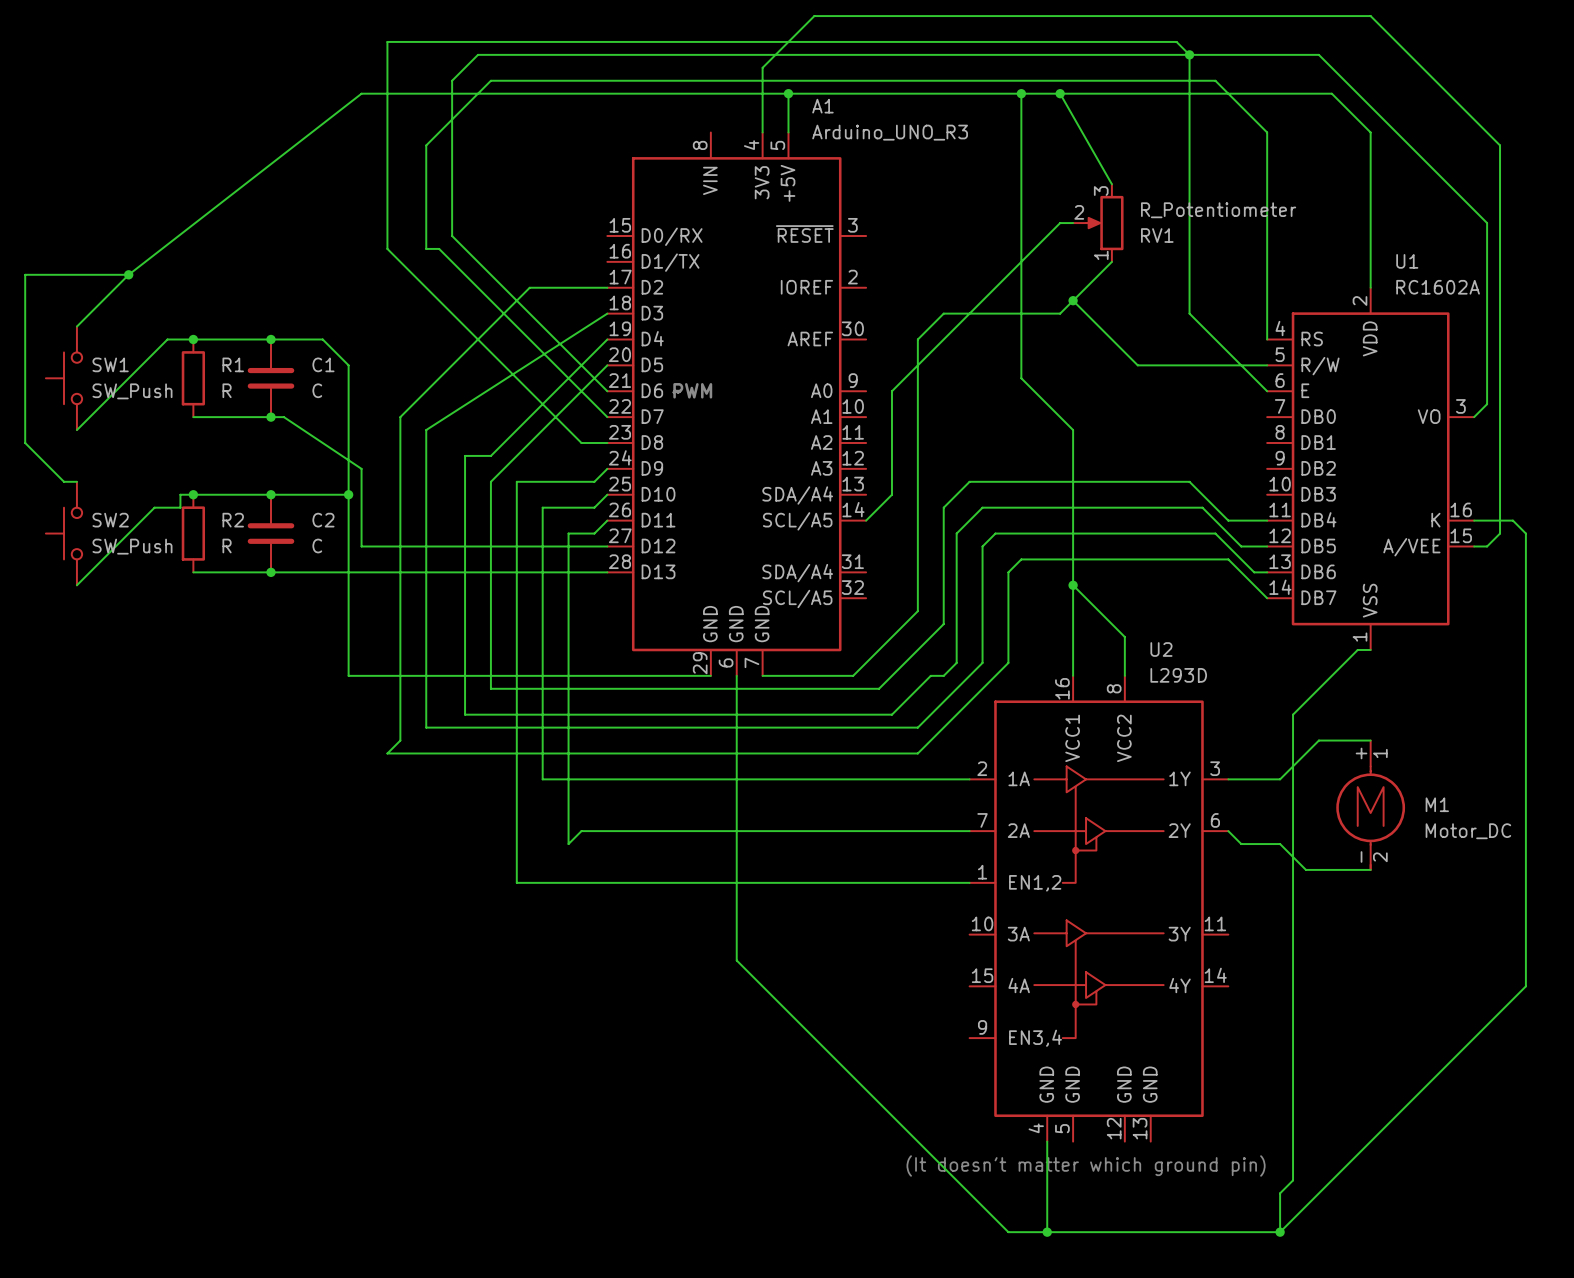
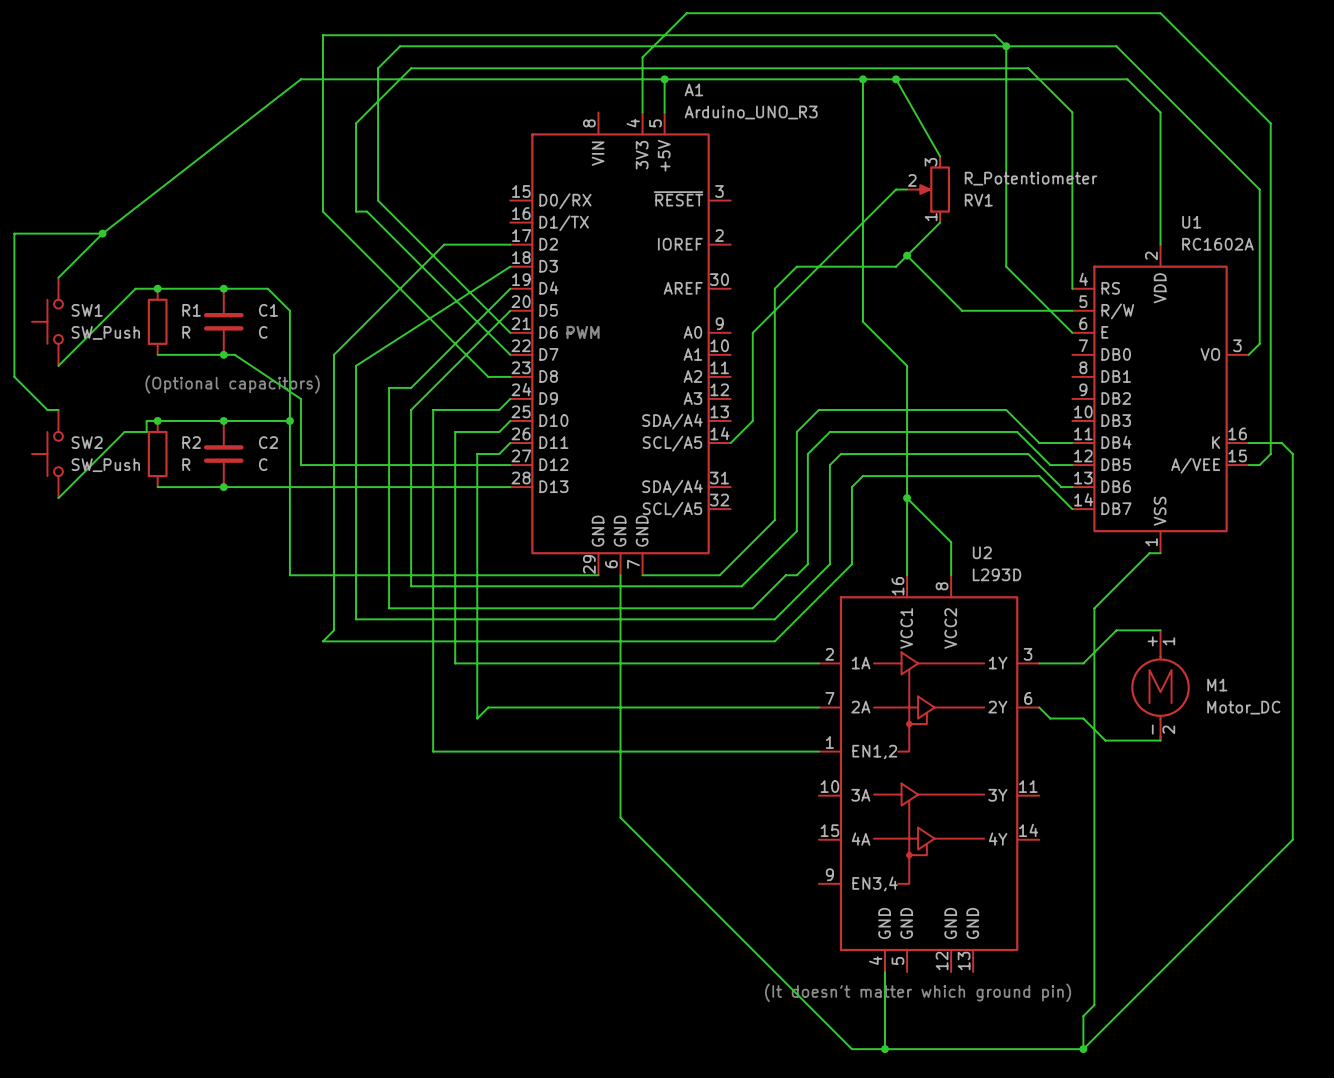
text: none -> (Optional capacitors) (232, 384)

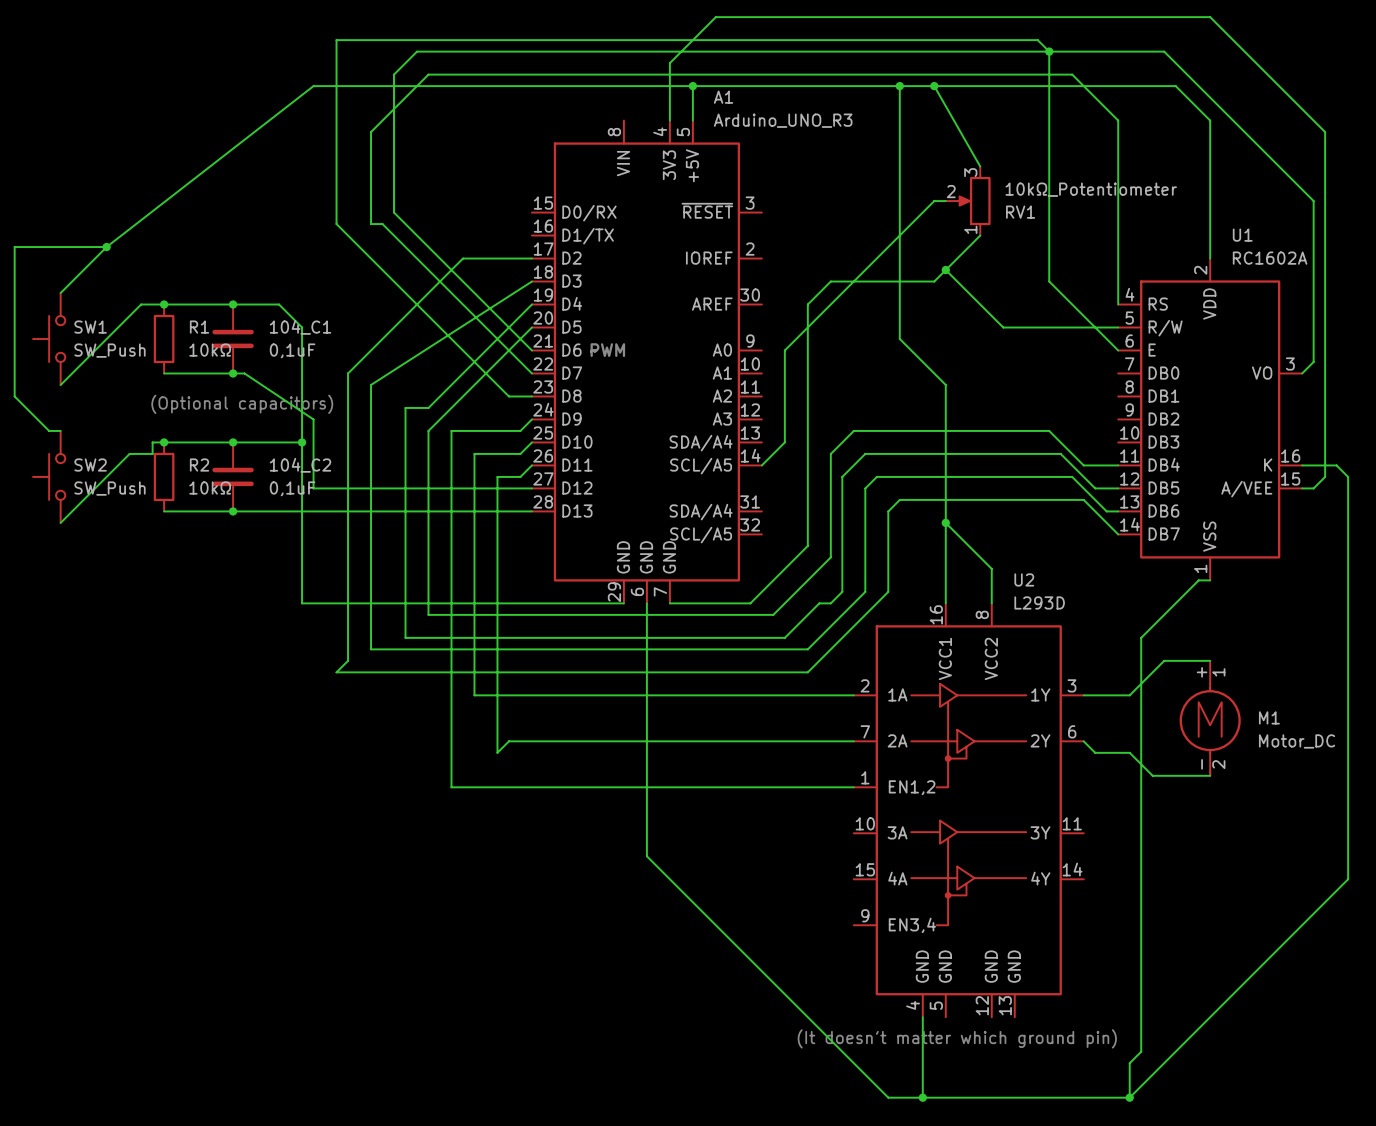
RV1 value: R_Potentiometer (1030, 178) -> 10kΩ_Potentiometer (1091, 189)
C1 name: C1 (268, 310) -> 104_C1 (300, 327)
R1 value: R (186, 332) -> 10kΩ (210, 350)
C1 value: C (263, 332) -> 0,1uF (292, 350)
C2 name: C2 (268, 442) -> 104_C2 (300, 465)
R2 value: R (186, 464) -> 10kΩ (210, 488)
C2 value: C (263, 464) -> 0,1uF (292, 488)

